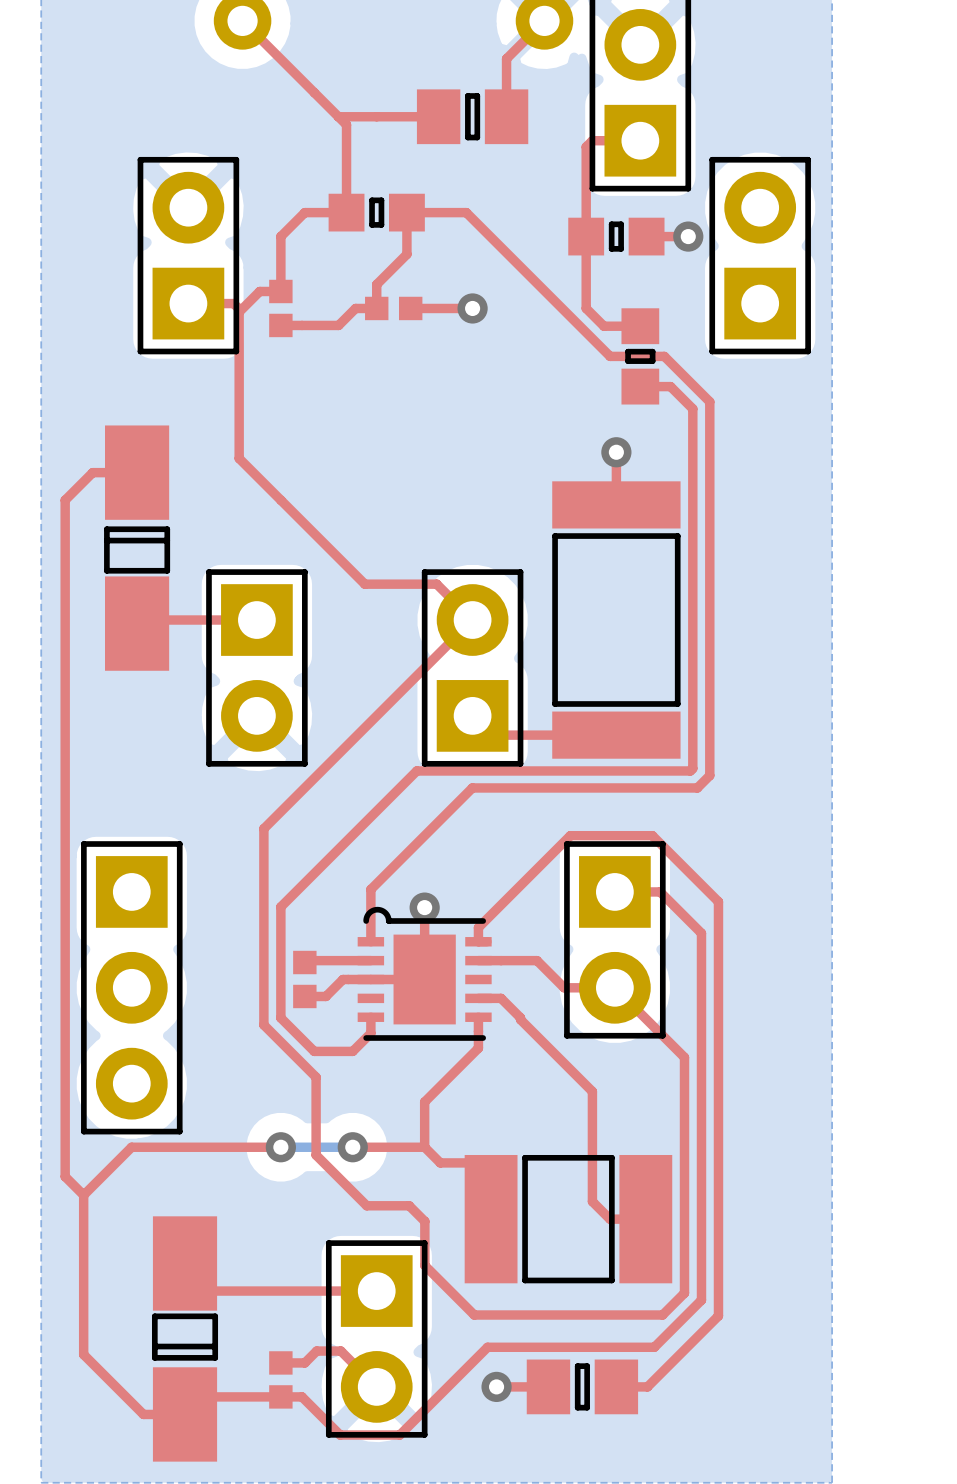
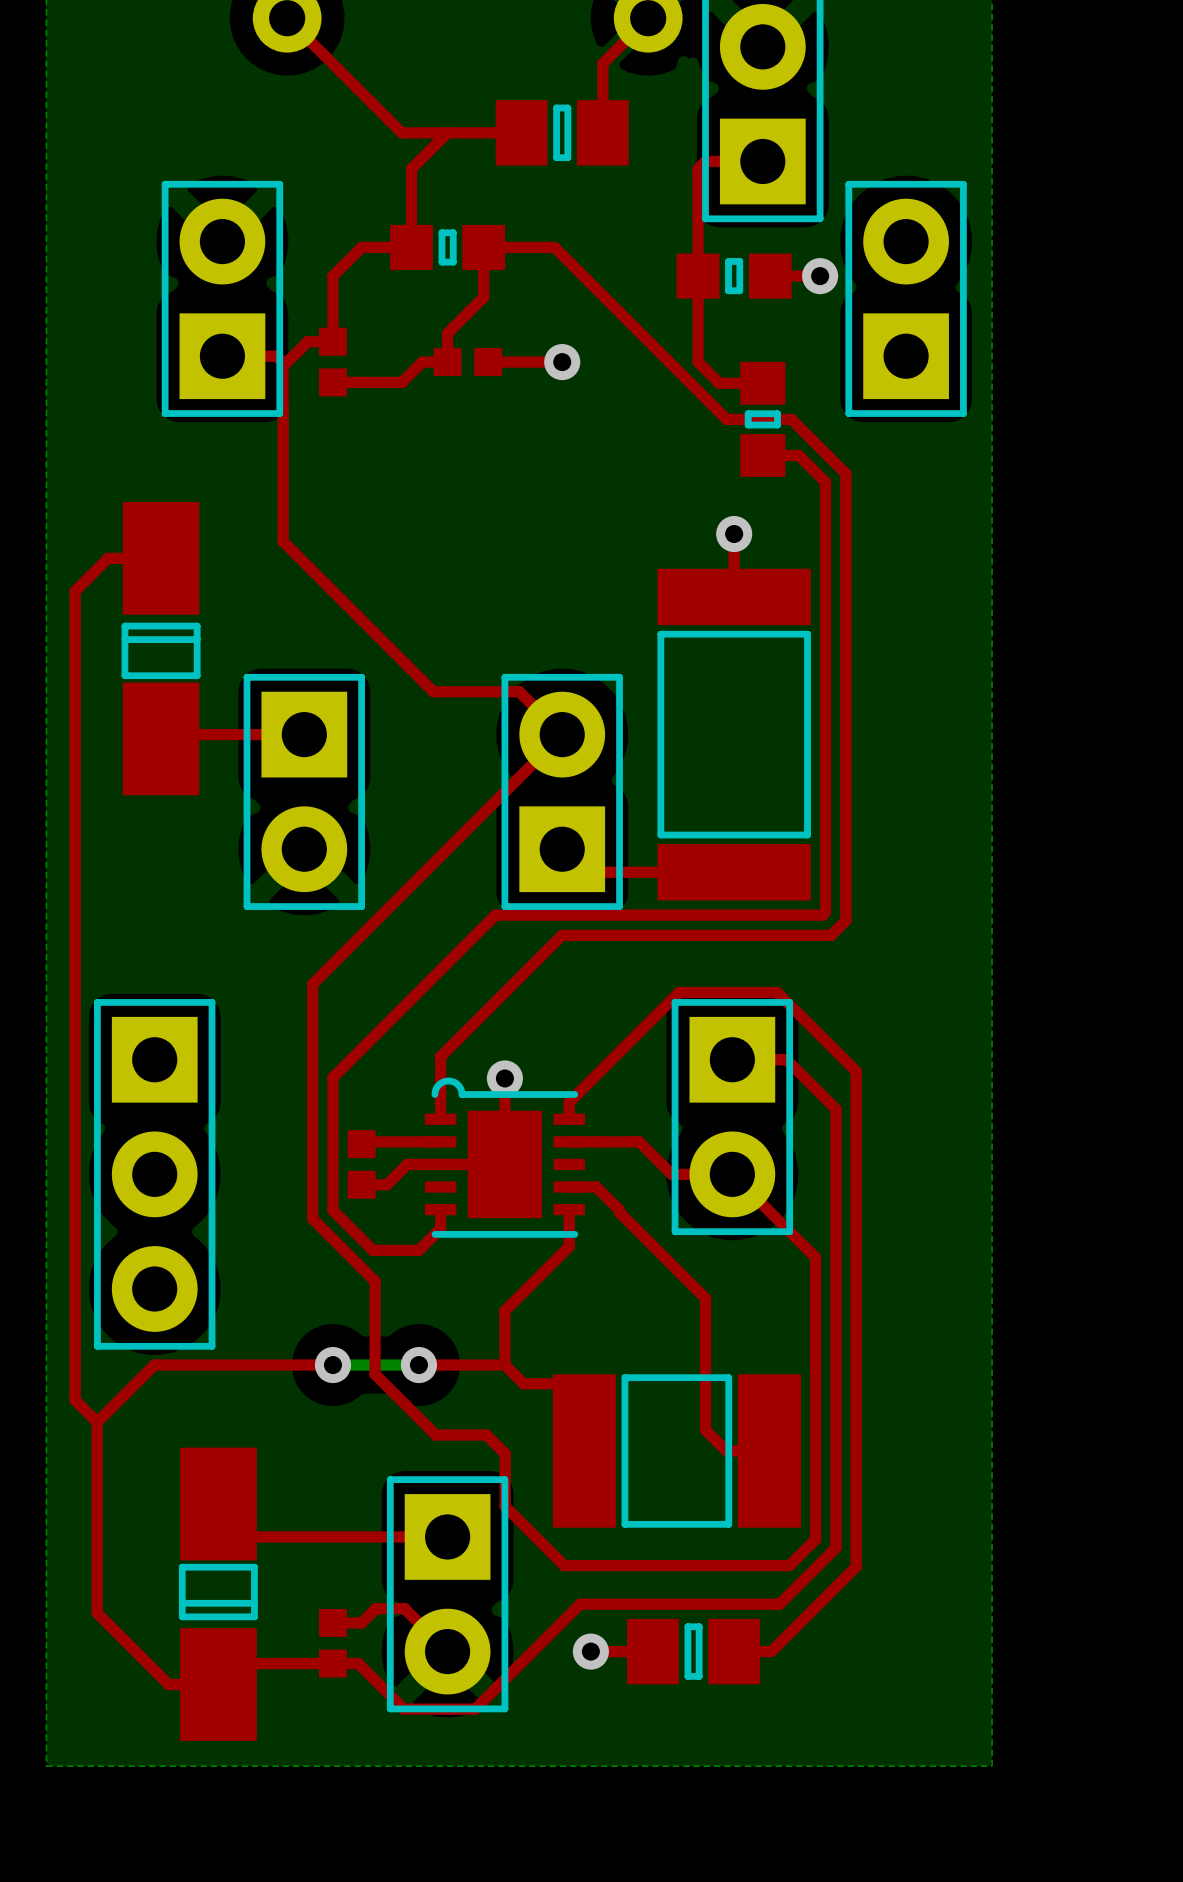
top track: (338, 116) (346, 124) (346, 146) -> (447, 132) (411, 168)

